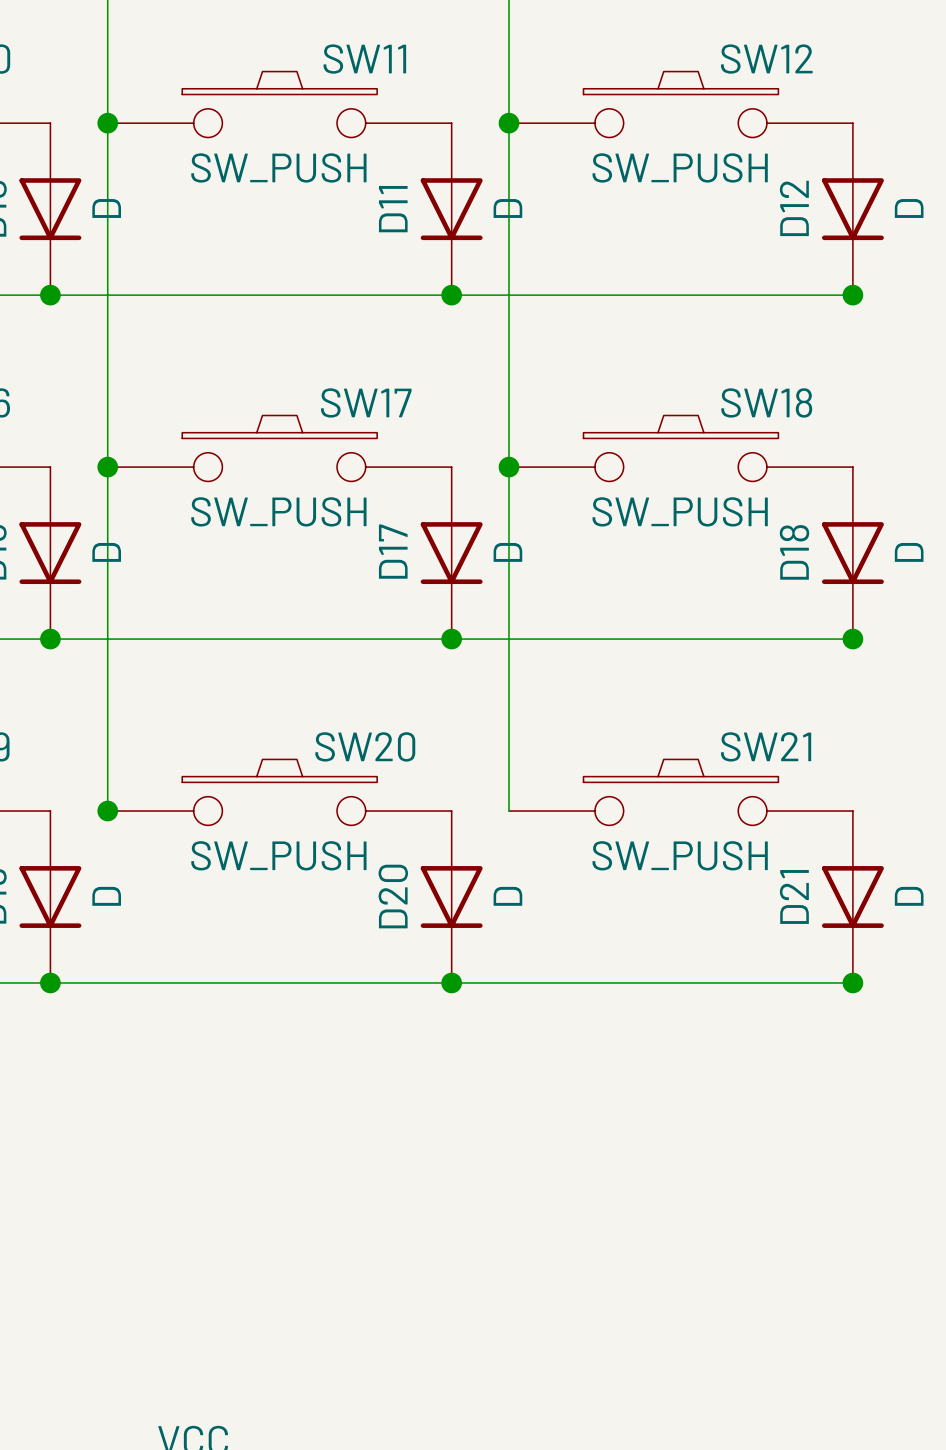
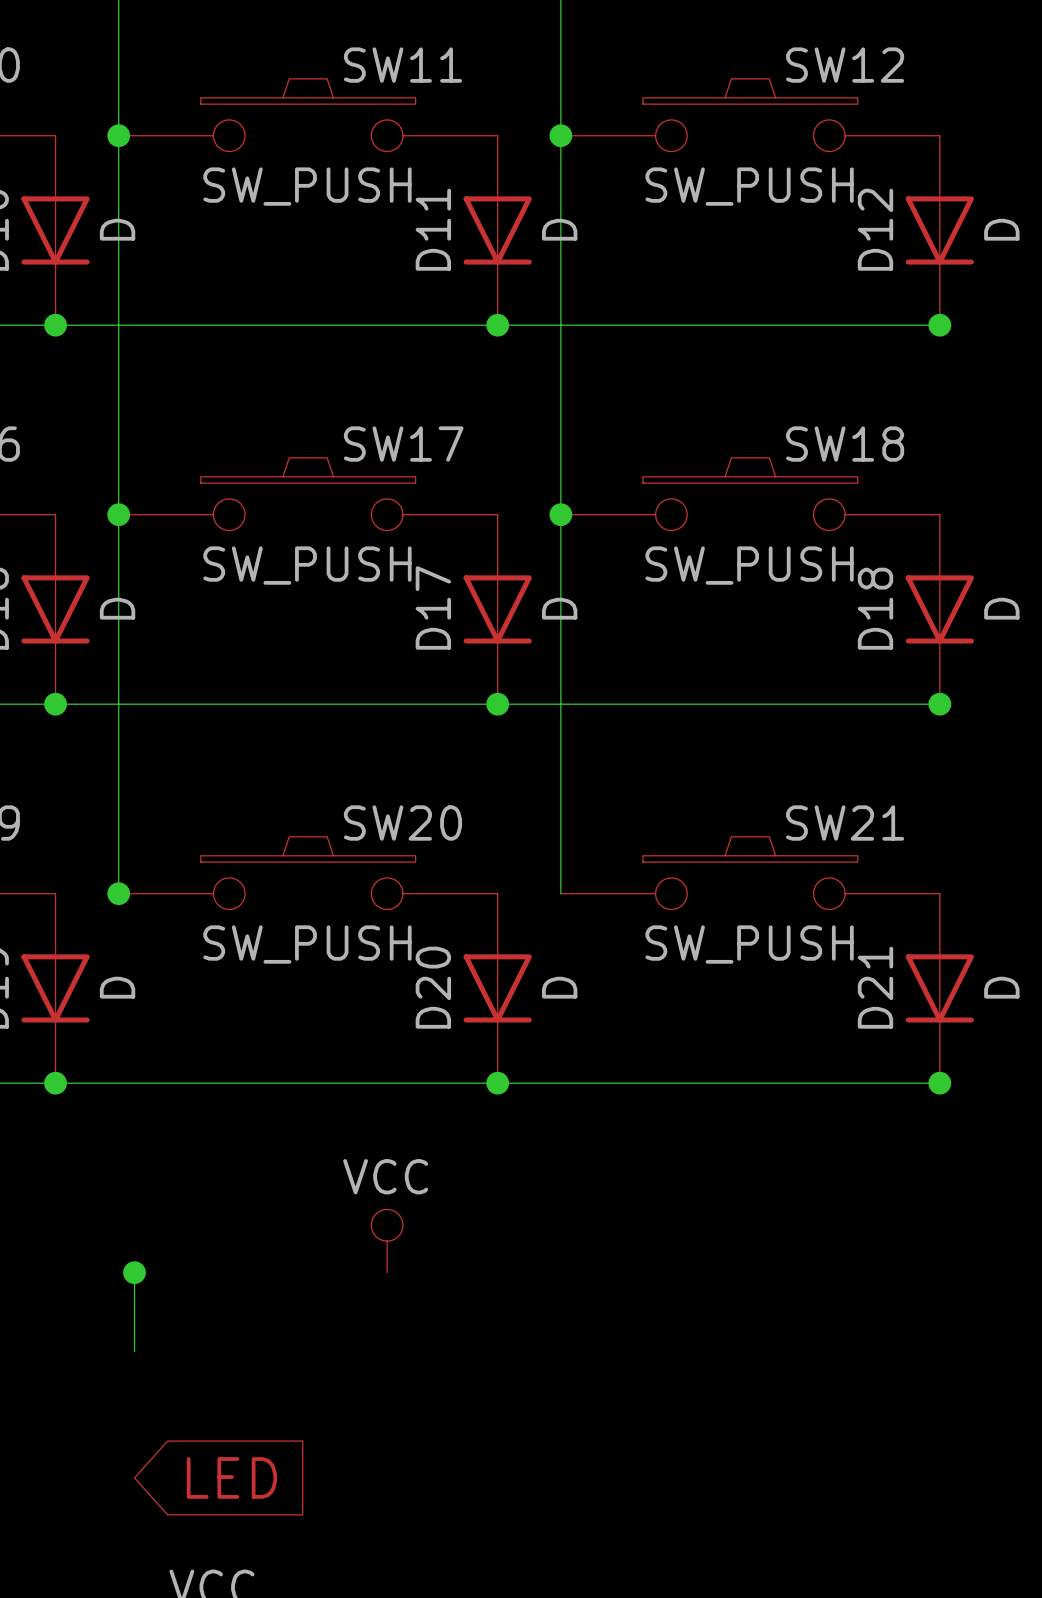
power symbol: none -> VCC (387, 1241)
wire: none -> (134, 1272) (134, 1351)
junction: none -> (134, 1272)
global label: none -> LED (231, 1477)

